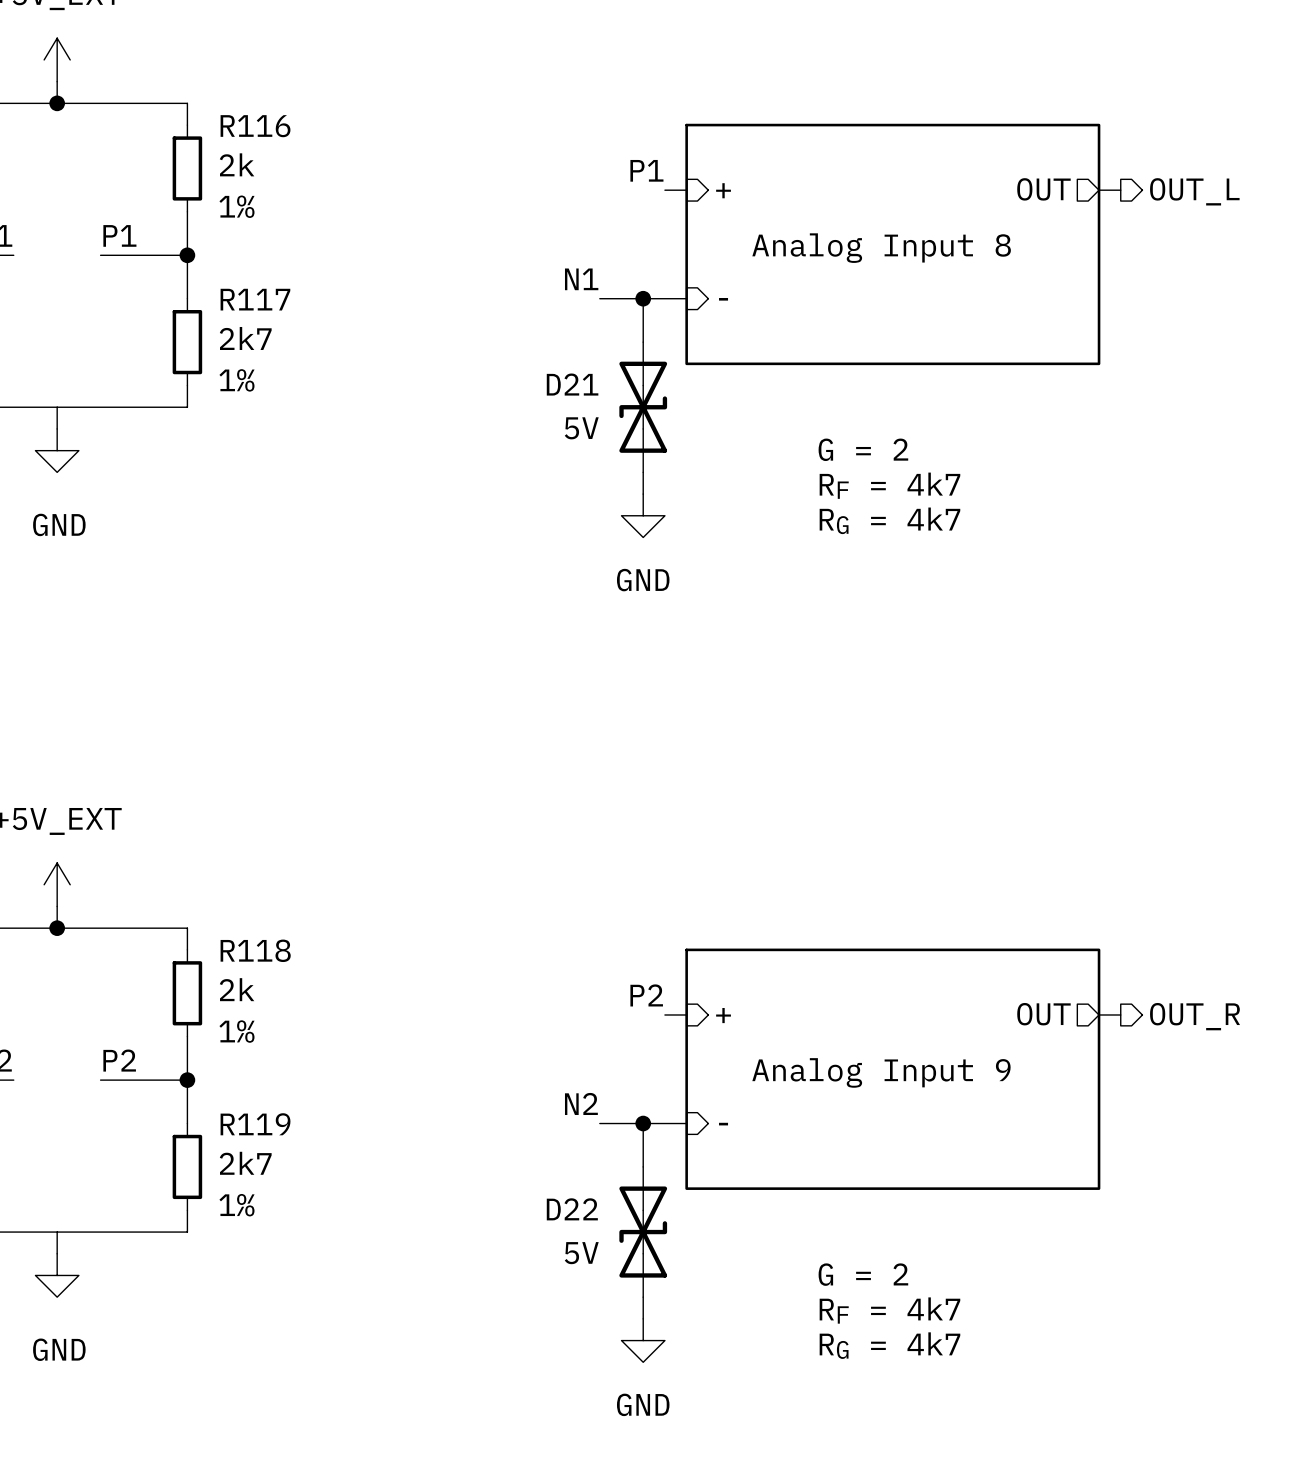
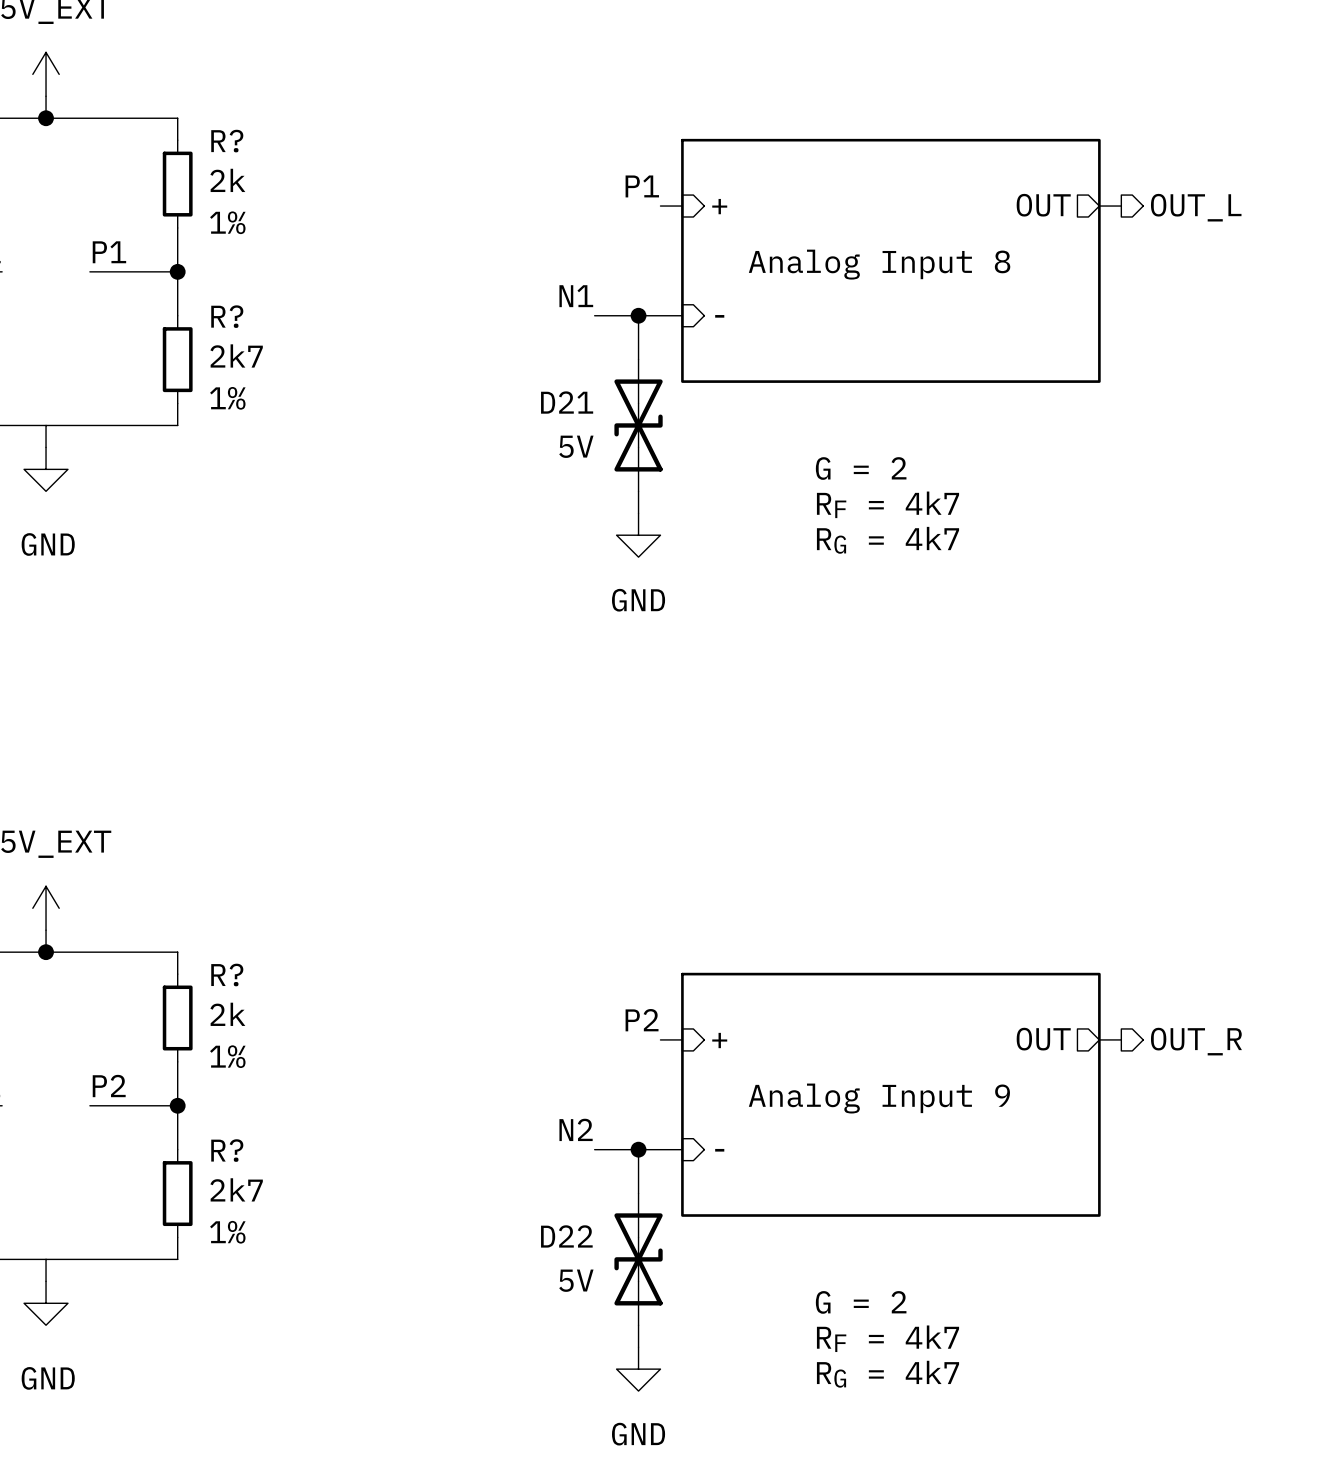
R116 name: R116 (255, 126) -> R? (227, 141)
R117 name: R117 (255, 299) -> R? (227, 316)
R118 name: R118 (255, 950) -> R? (227, 975)
R119 name: R119 (255, 1124) -> R? (227, 1150)

